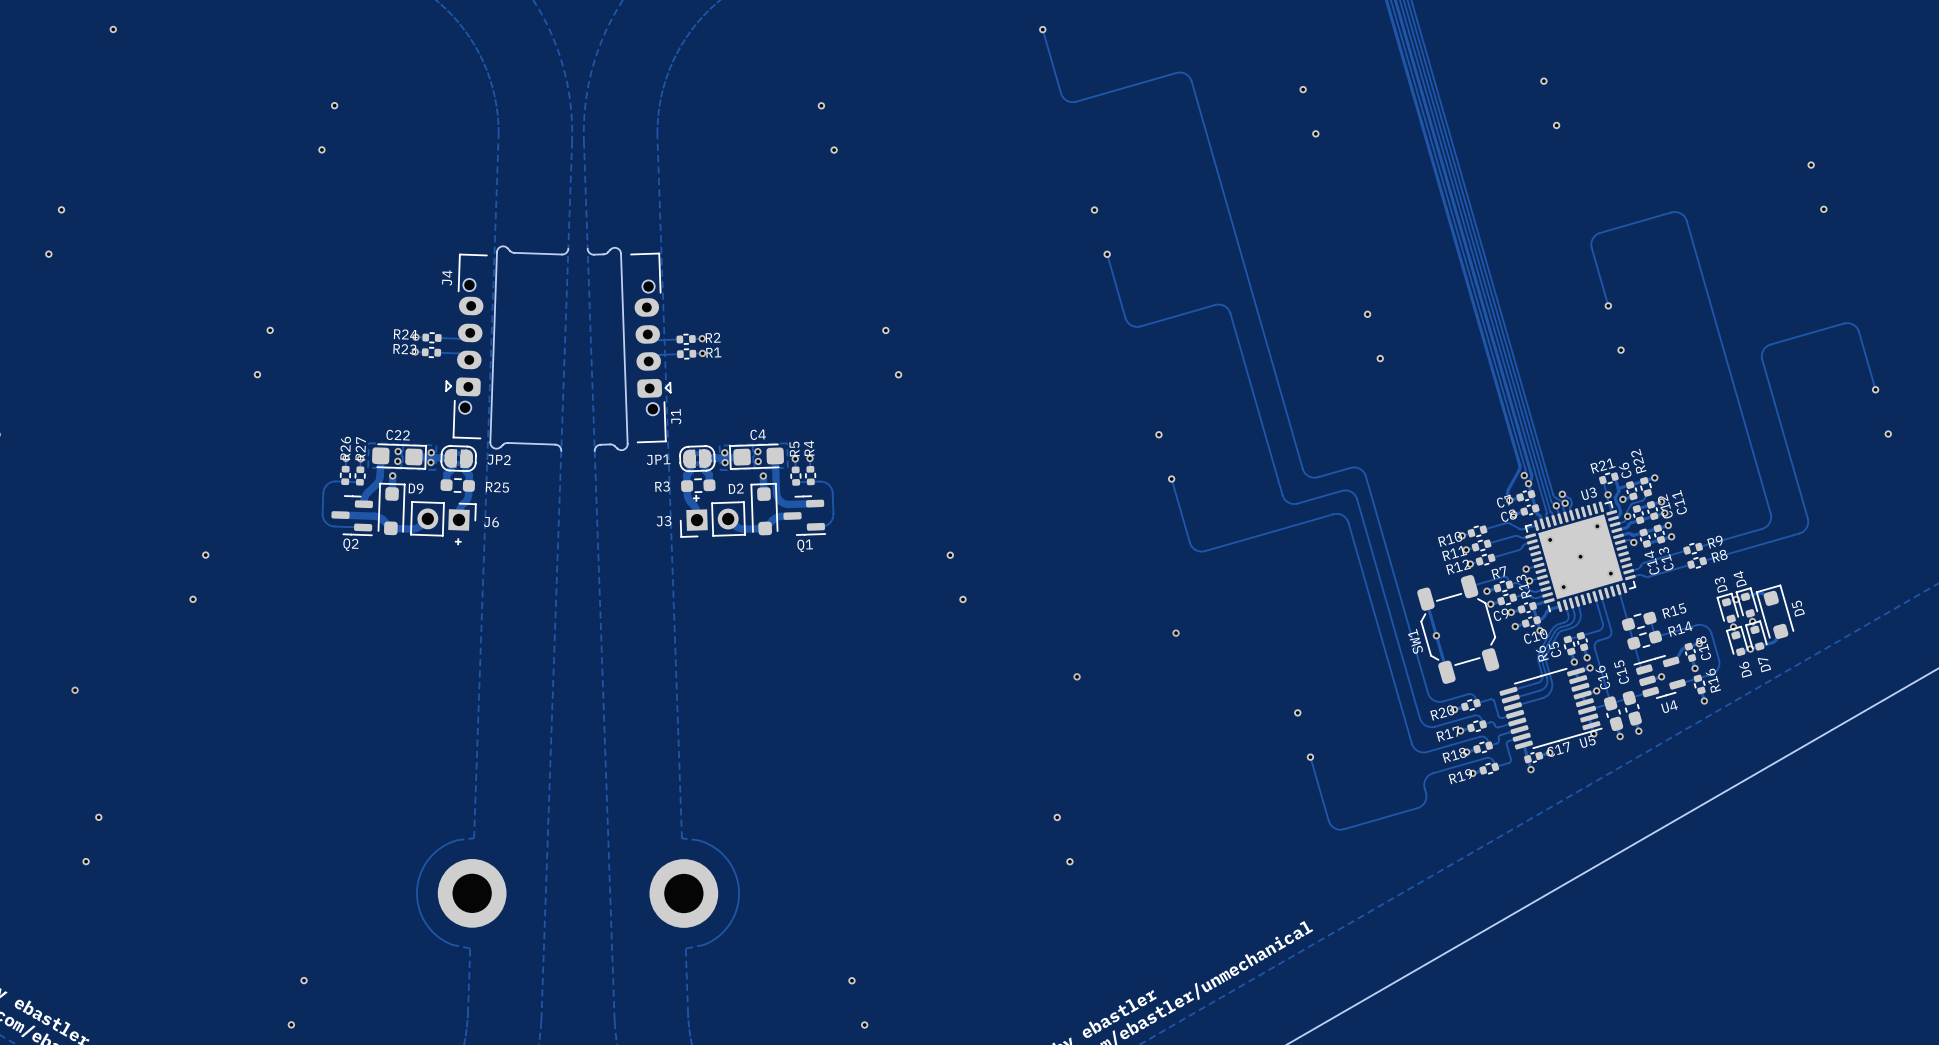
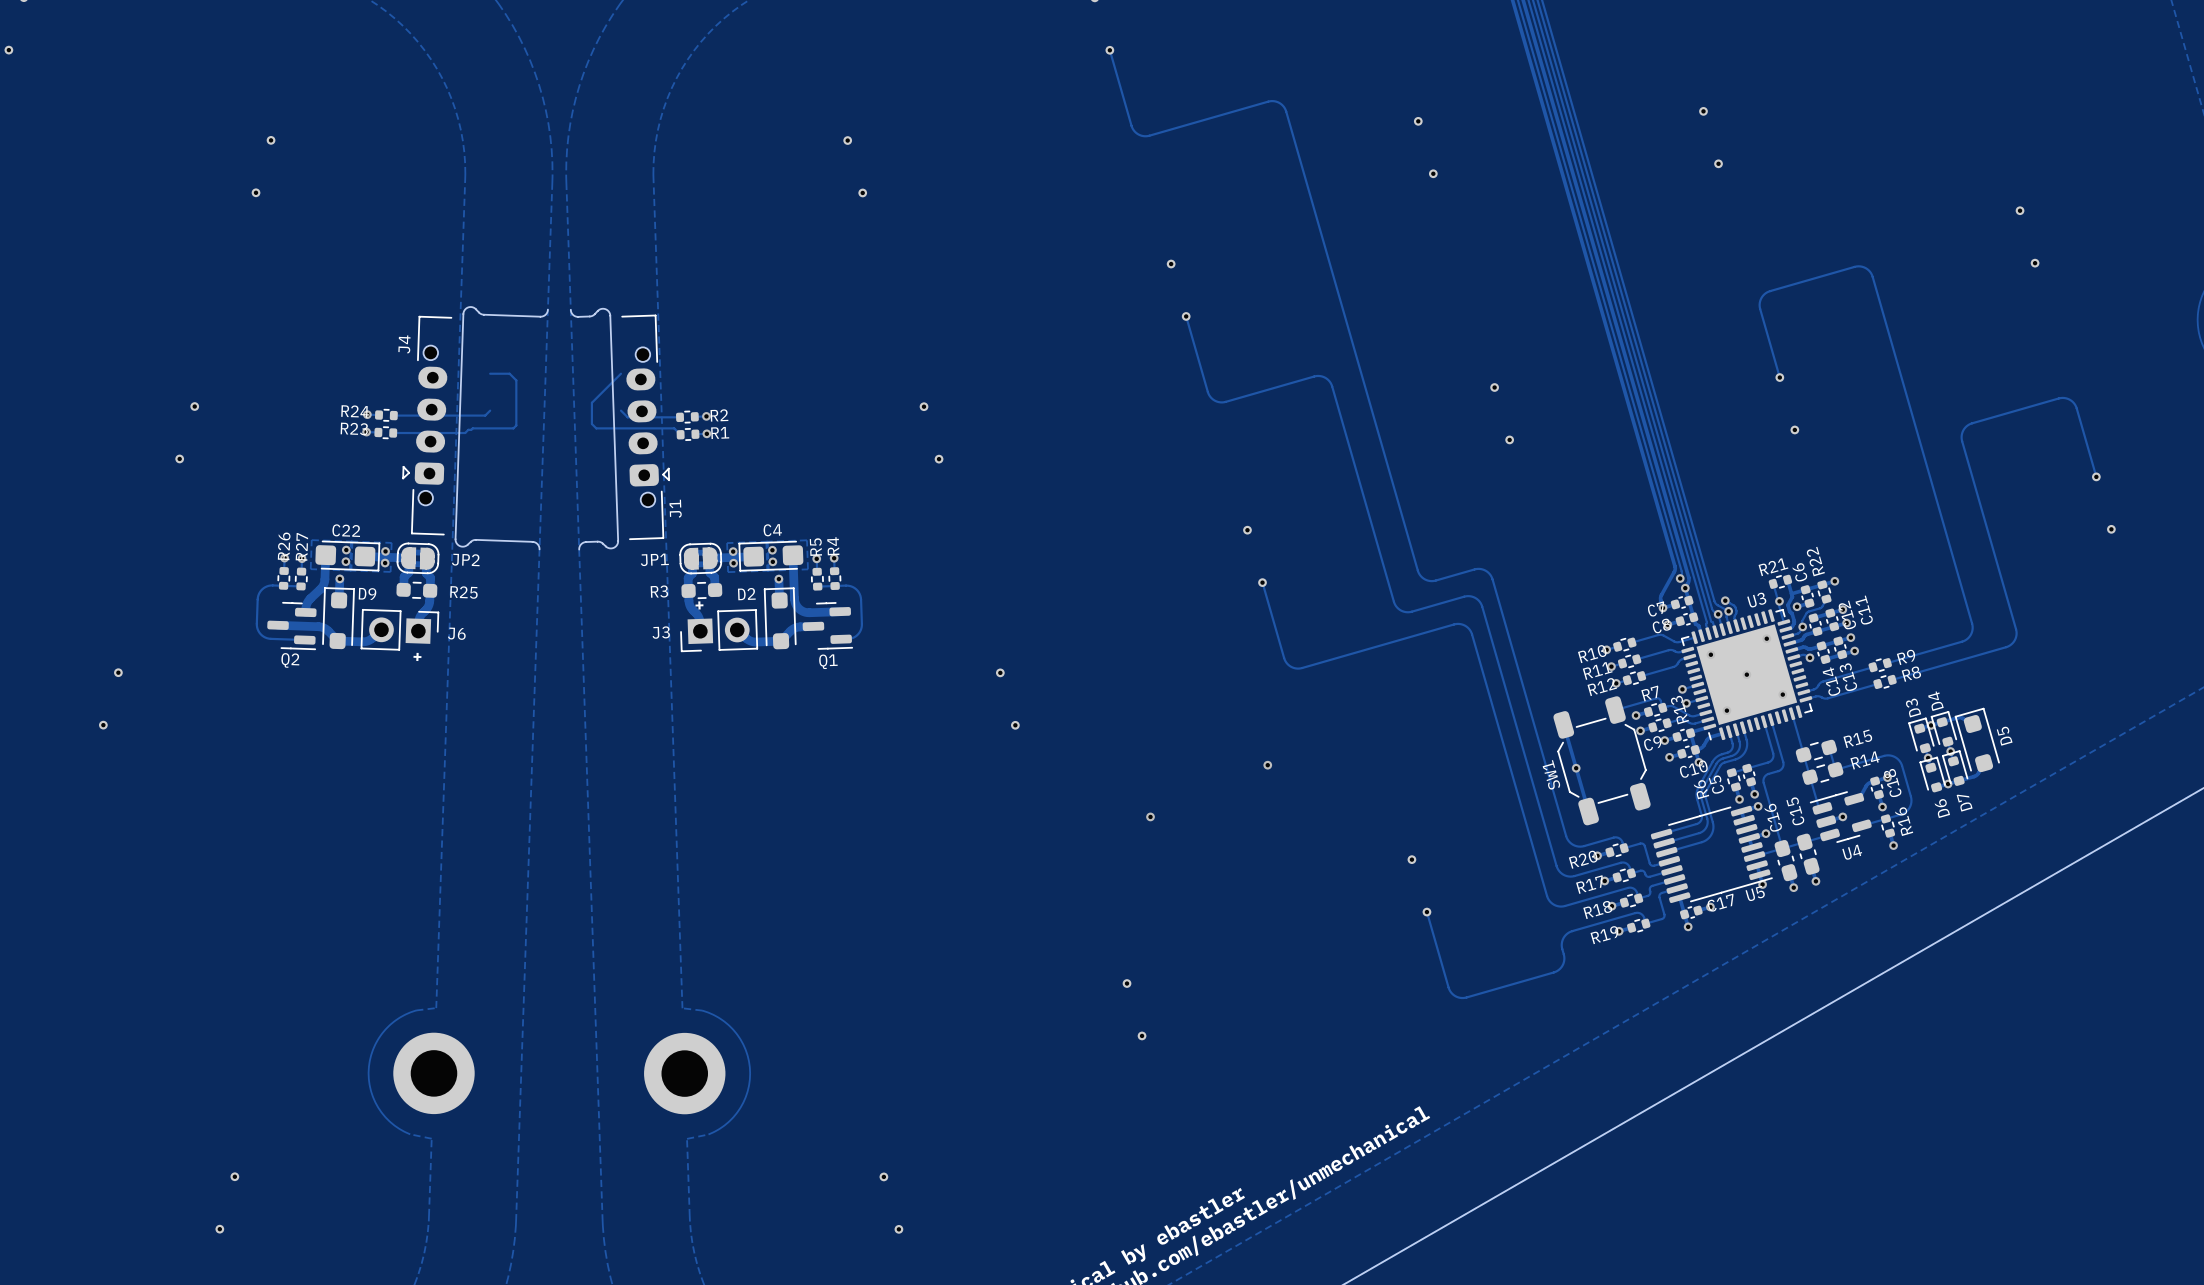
track: (470, 332) (461, 338) (438, 338) -> (490, 410) (485, 415) (393, 415)
track: (647, 334) (657, 340) (679, 339) -> (620, 410) (627, 417) (680, 417)
track: (437, 352) (460, 353) (469, 359) -> (393, 433) (465, 433) (472, 428) (513, 428) (516, 425) (516, 380) (509, 373) (490, 373)
track: (680, 354) (657, 355) (648, 361) -> (680, 434) (674, 428) (596, 428) (591, 424) (591, 402) (620, 373)

